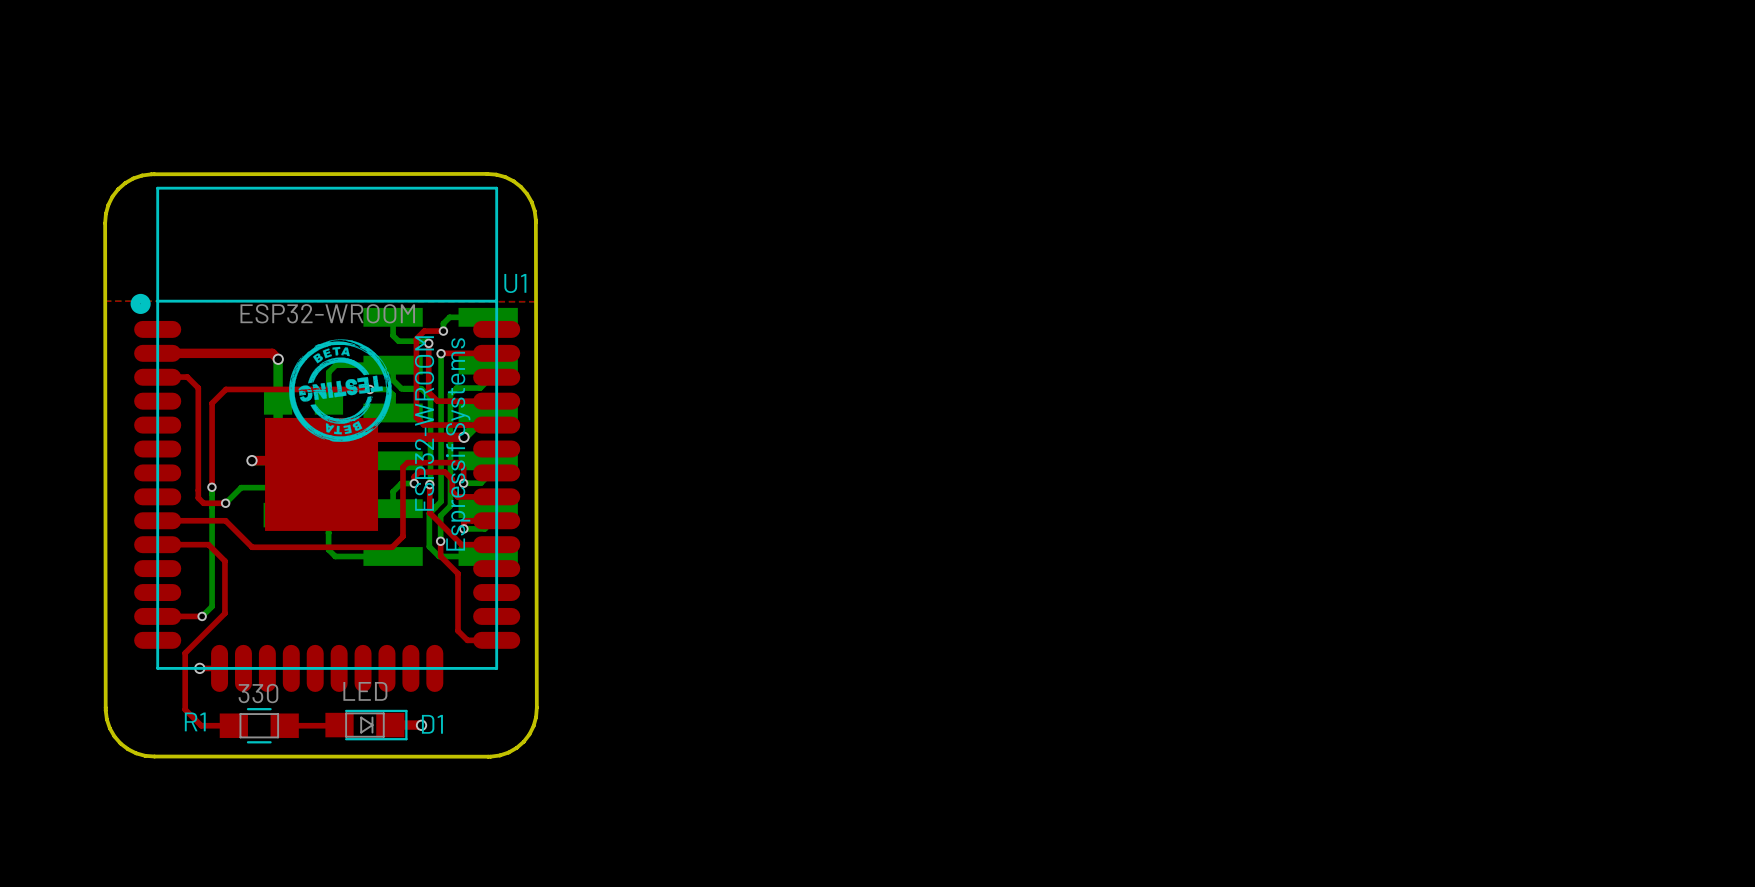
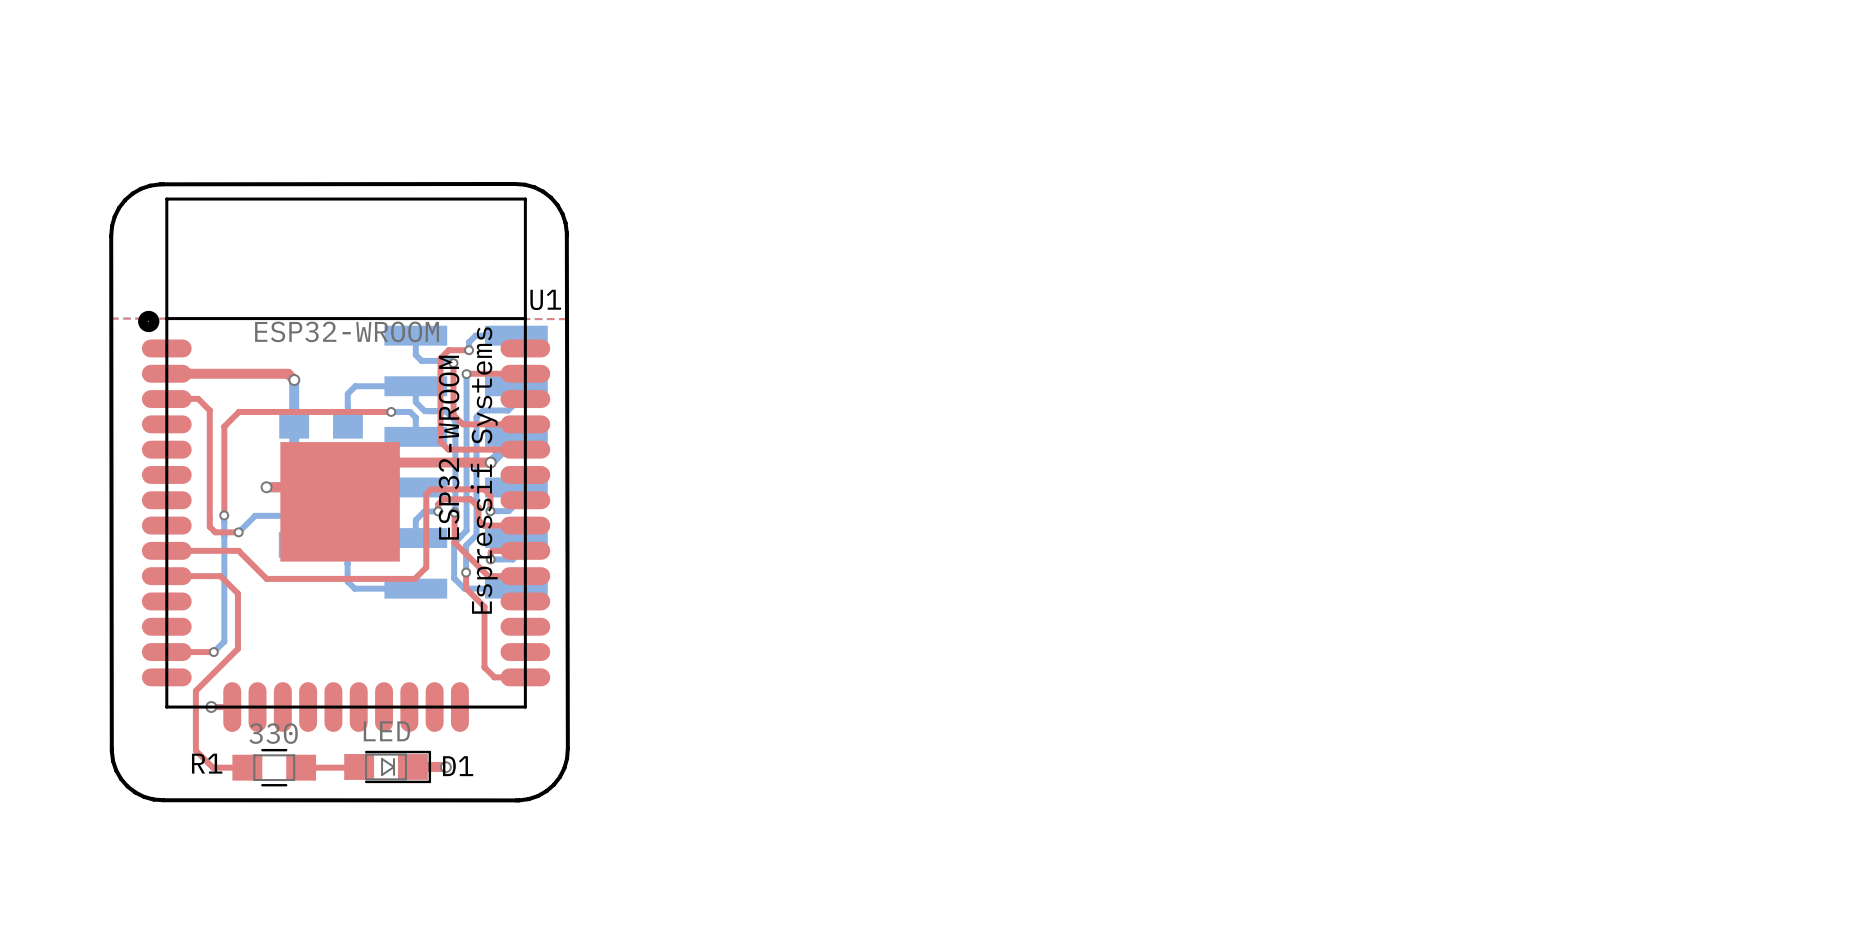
drawing: [289, 339, 392, 442] -> none

